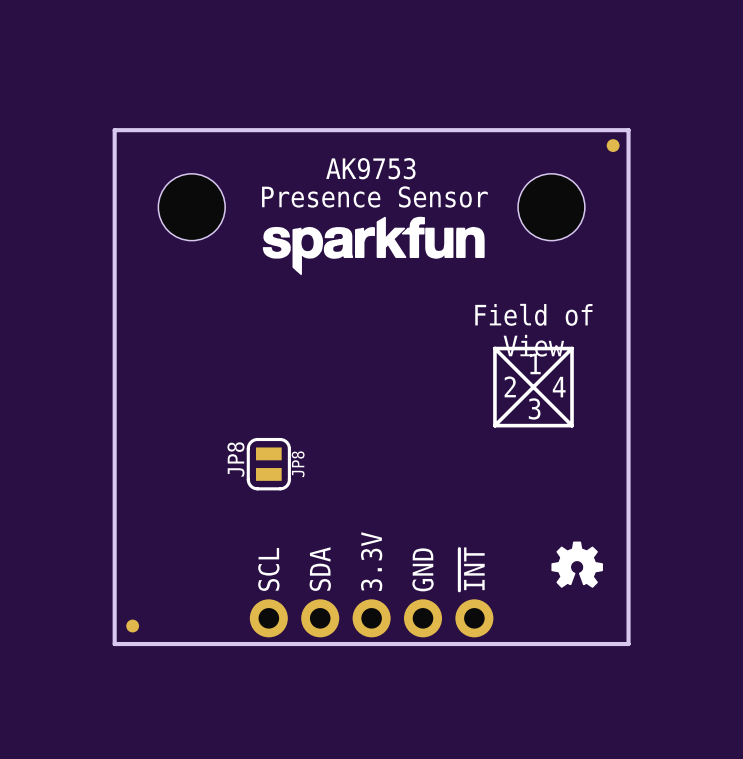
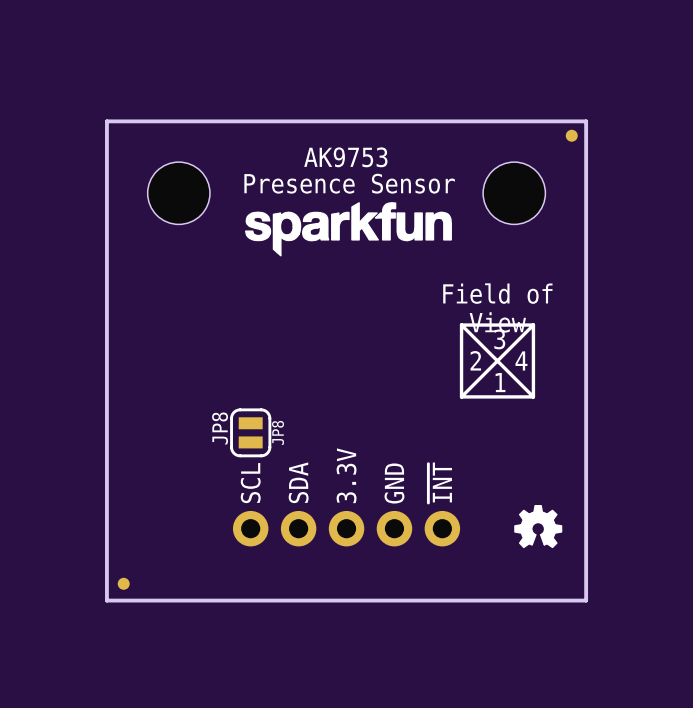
text: 1 (535, 363) -> 3 (499, 339)
text: 3 (534, 408) -> 1 (500, 382)
text position: 3.3V (371, 561) -> 3.3V (346, 475)
text position: SCL (268, 569) -> SCL (250, 483)
text position: SDA (320, 569) -> SDA (298, 482)
text position: GND (423, 569) -> GND (394, 483)
text position: ~{INT} (472, 569) -> ~{INT} (440, 482)
part position: (345, 618) -> (322, 528)
part position: (474, 618) -> (442, 528)

